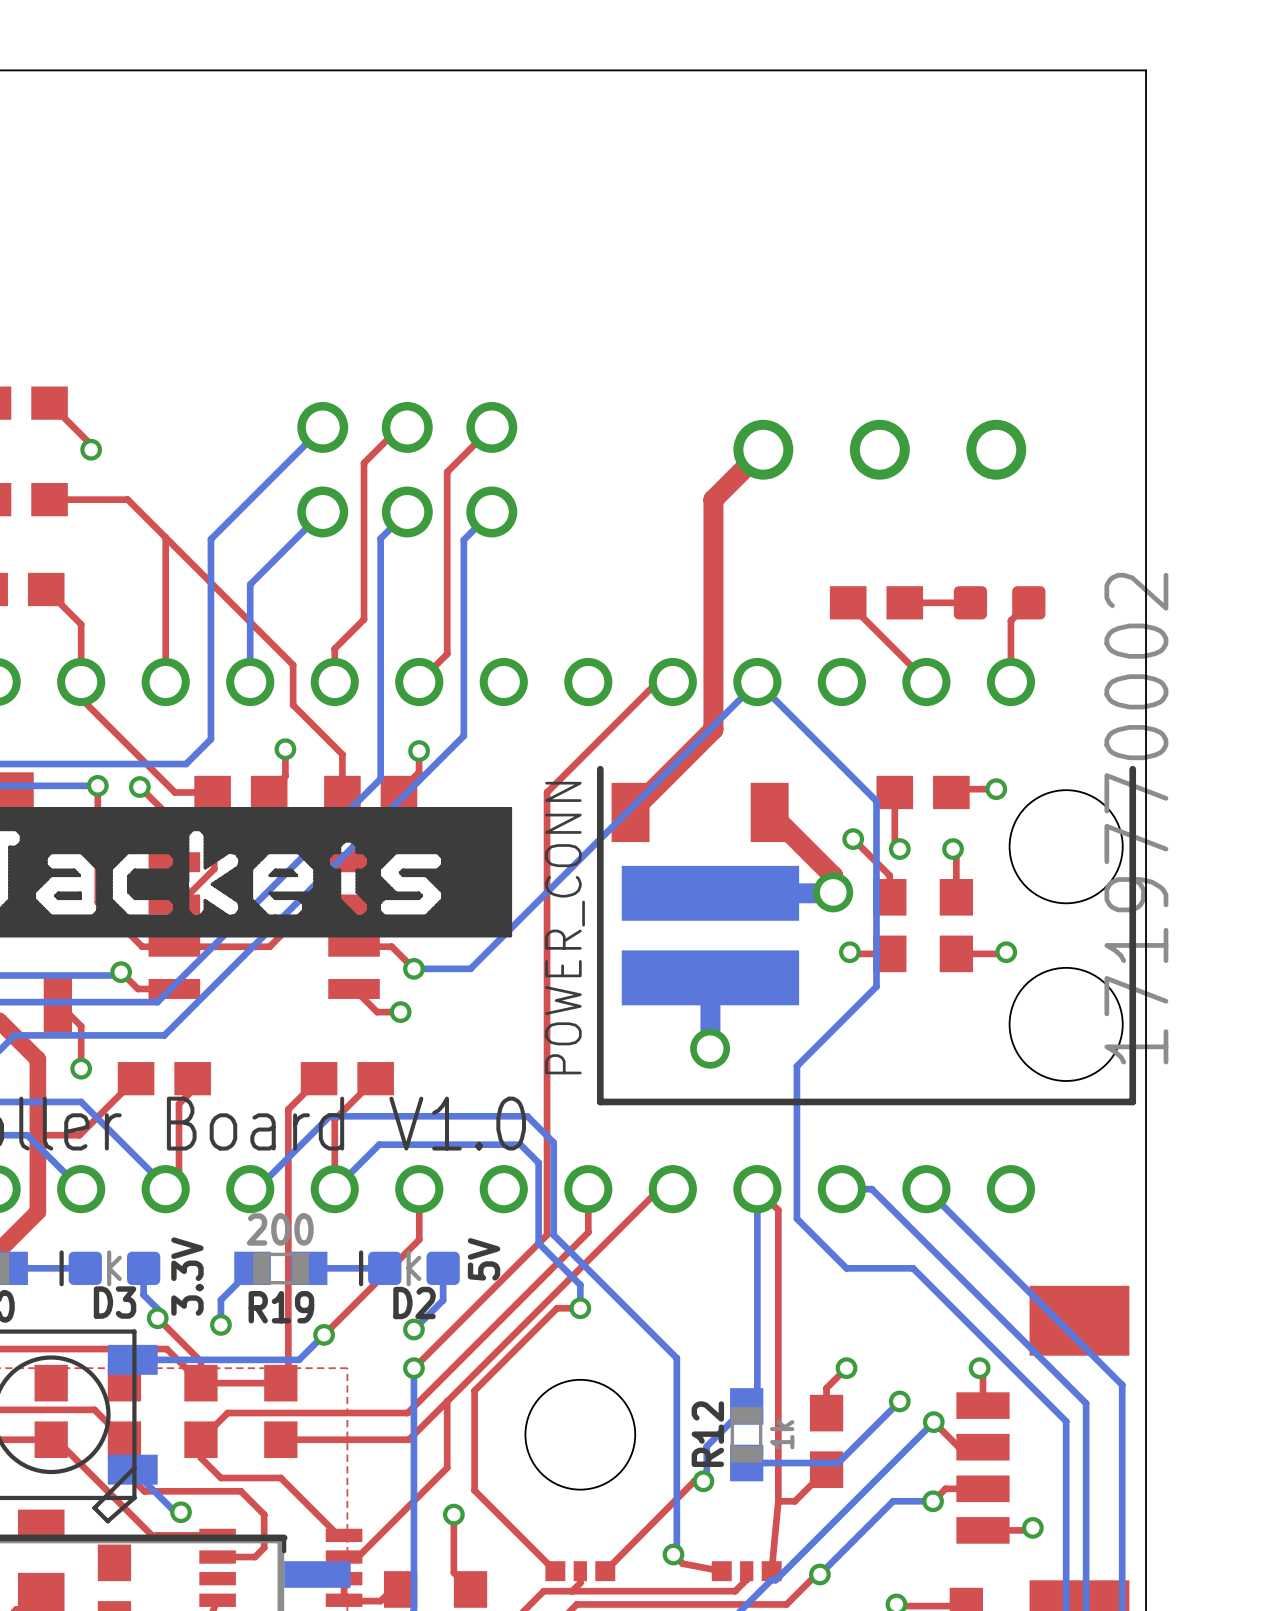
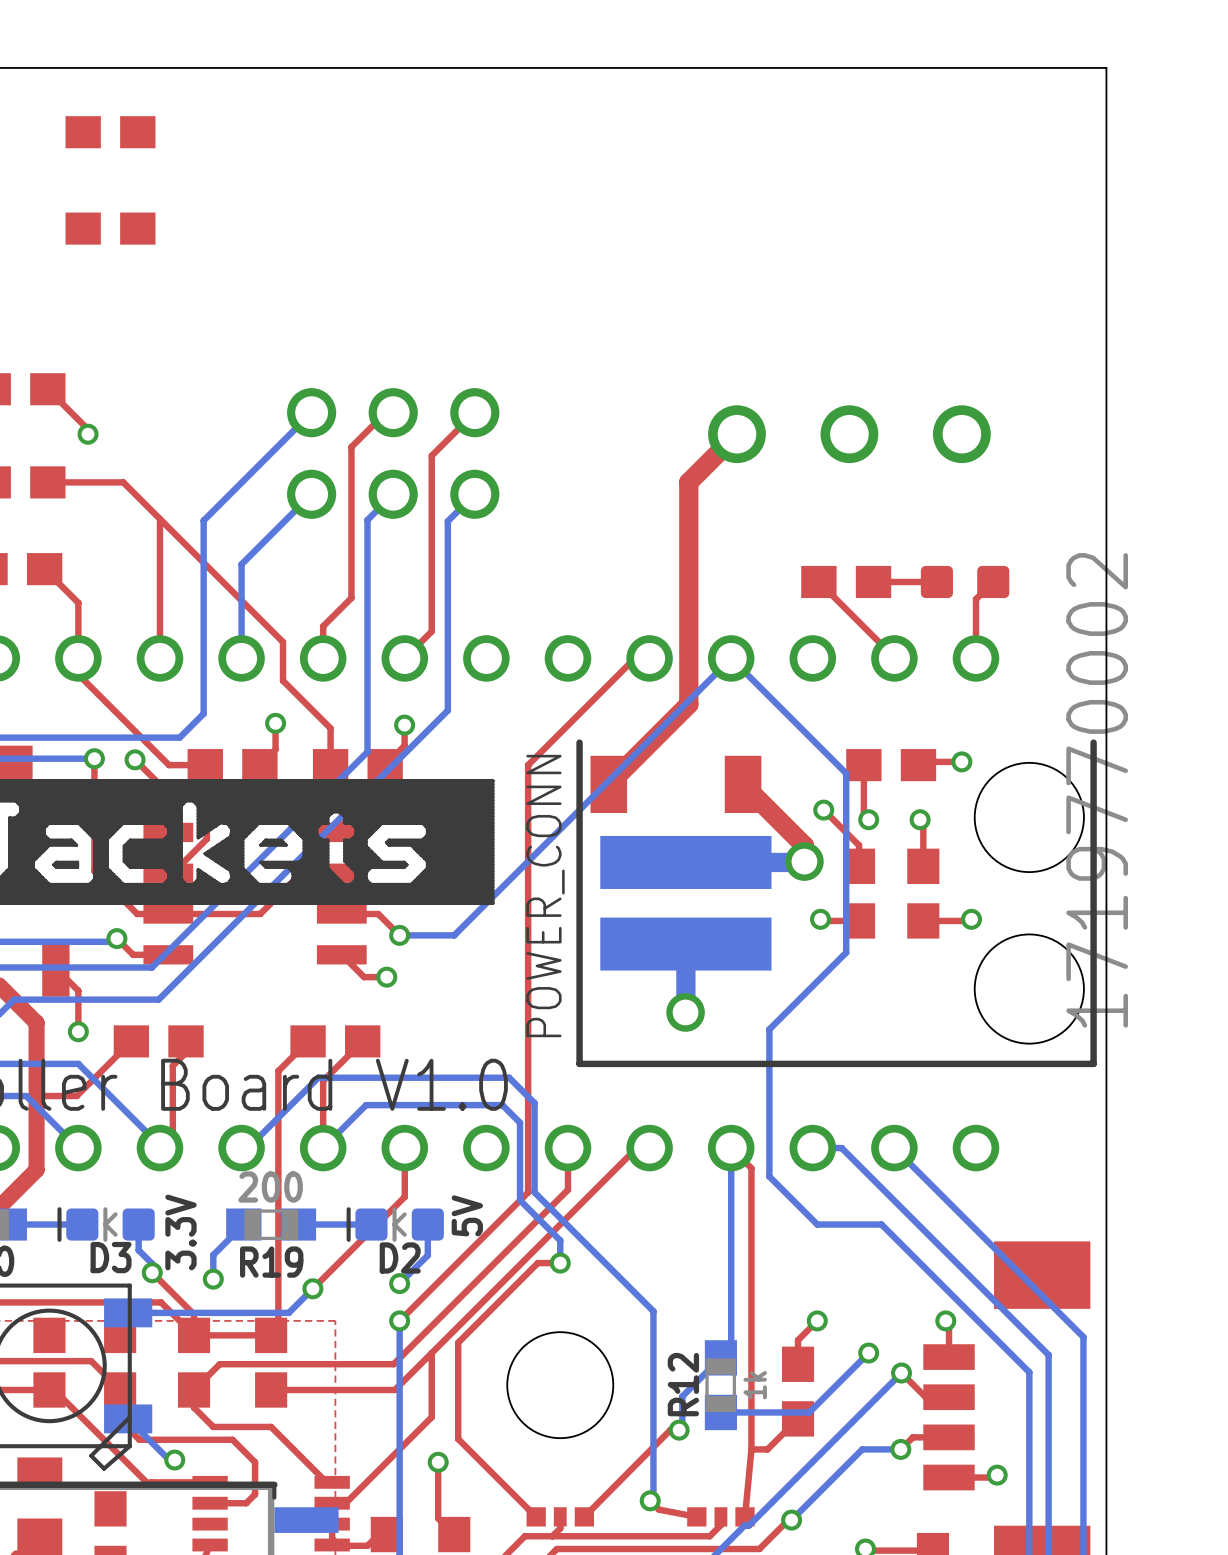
part: none -> (110, 132)
part: none -> (110, 228)

